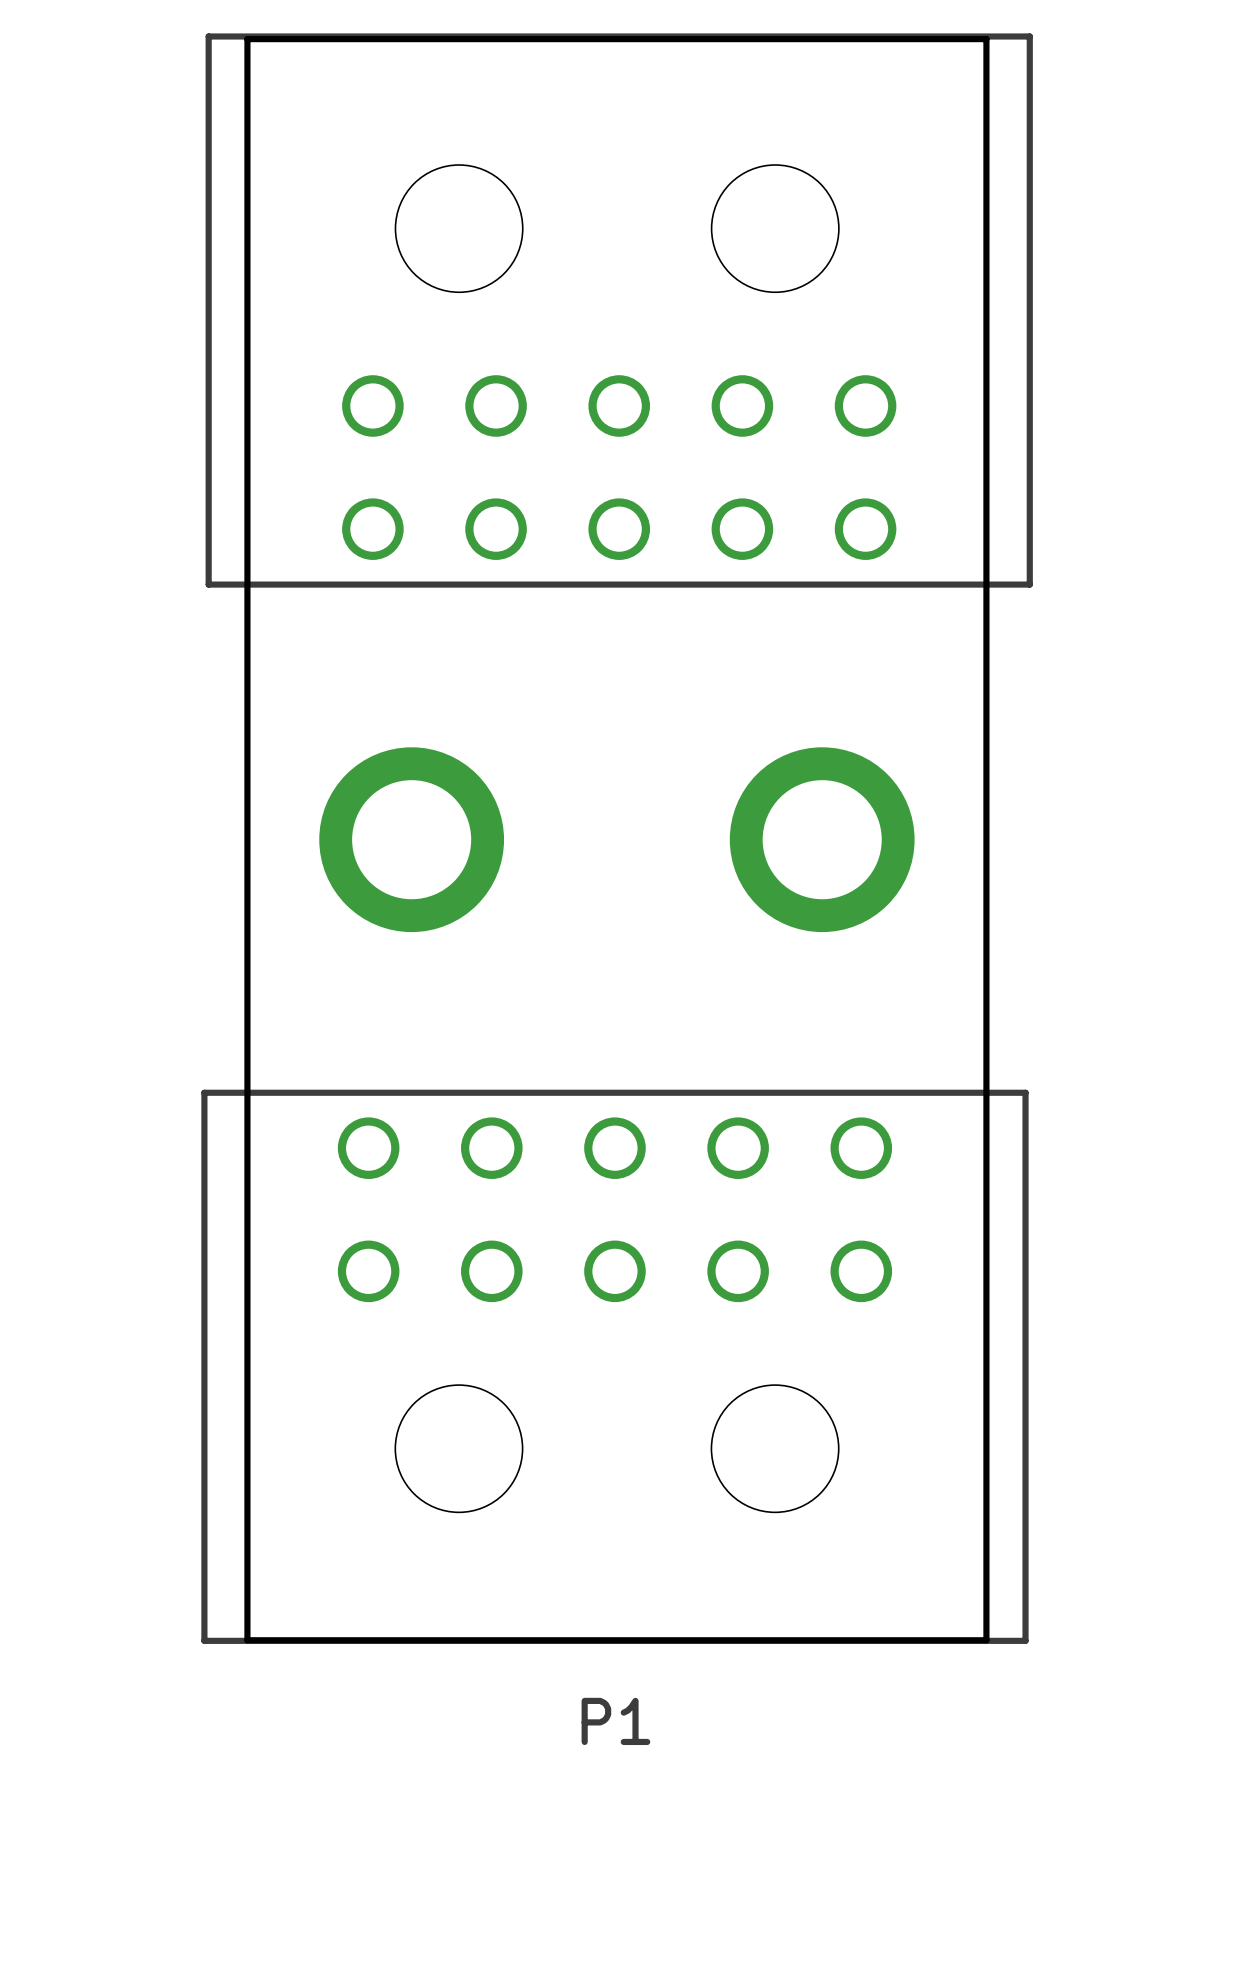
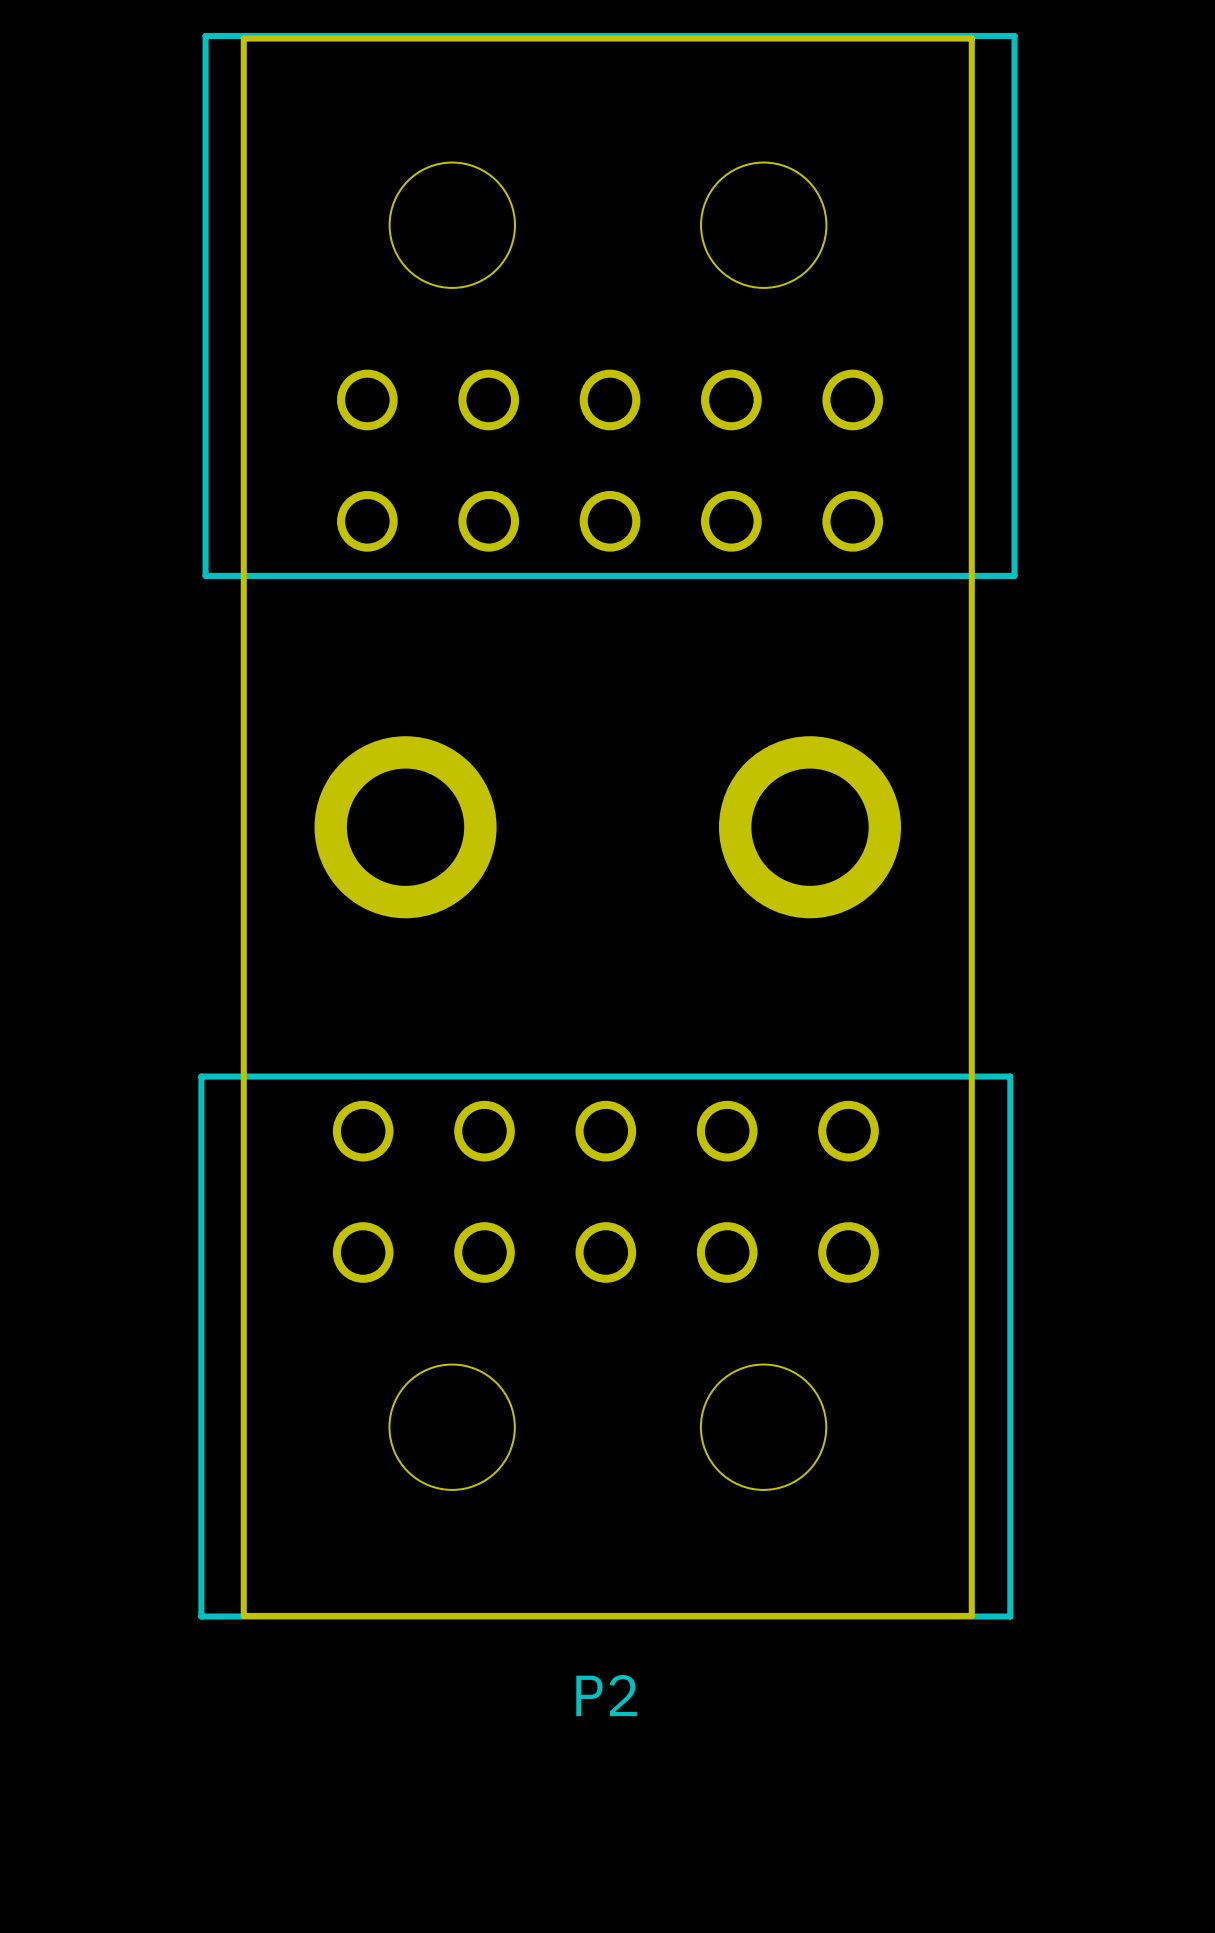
P1 name: P1 (615, 1721) -> P2 (606, 1695)

